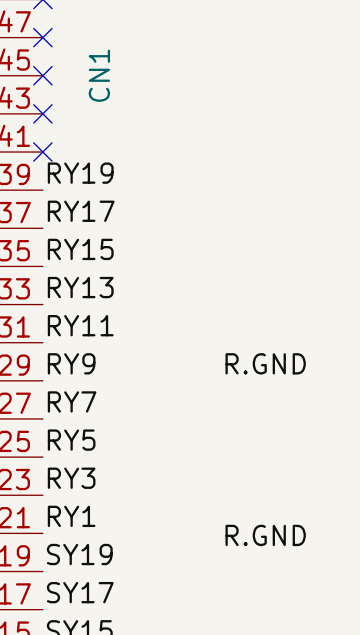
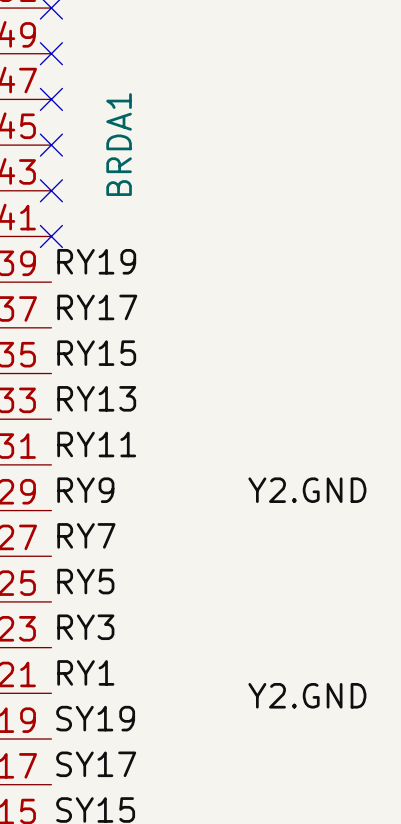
CN1 name: CN1 (99, 75) -> BRDA1 (119, 144)
label: R.GND (265, 363) -> Y2.GND (307, 490)
label: R.GND (265, 535) -> Y2.GND (307, 695)

